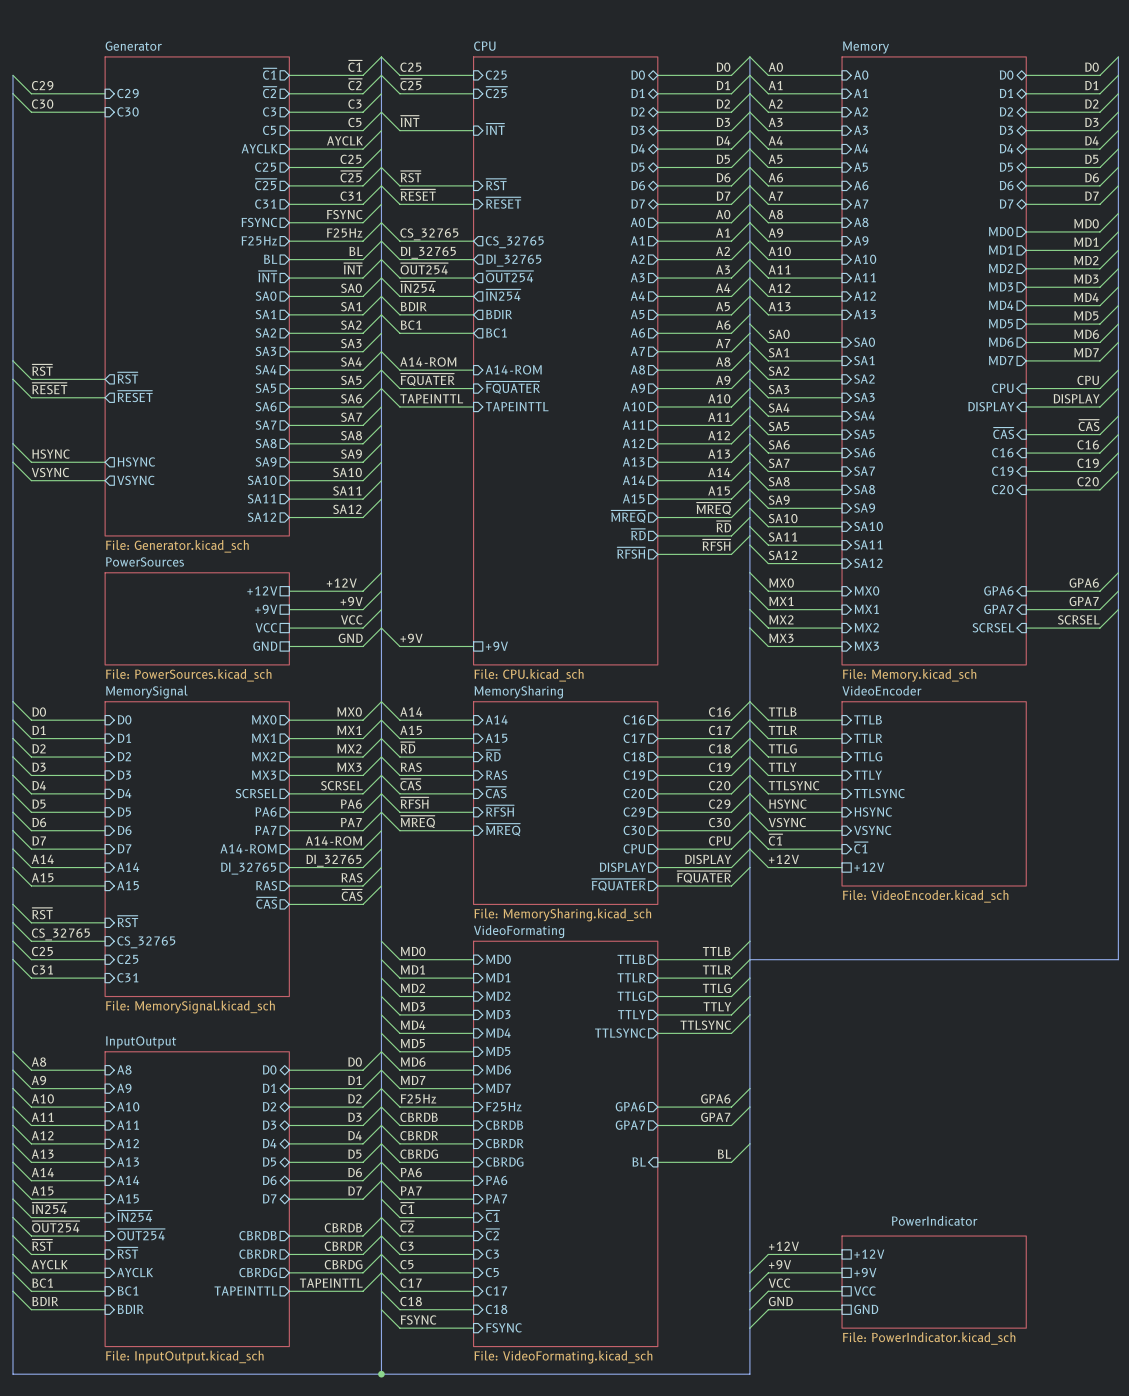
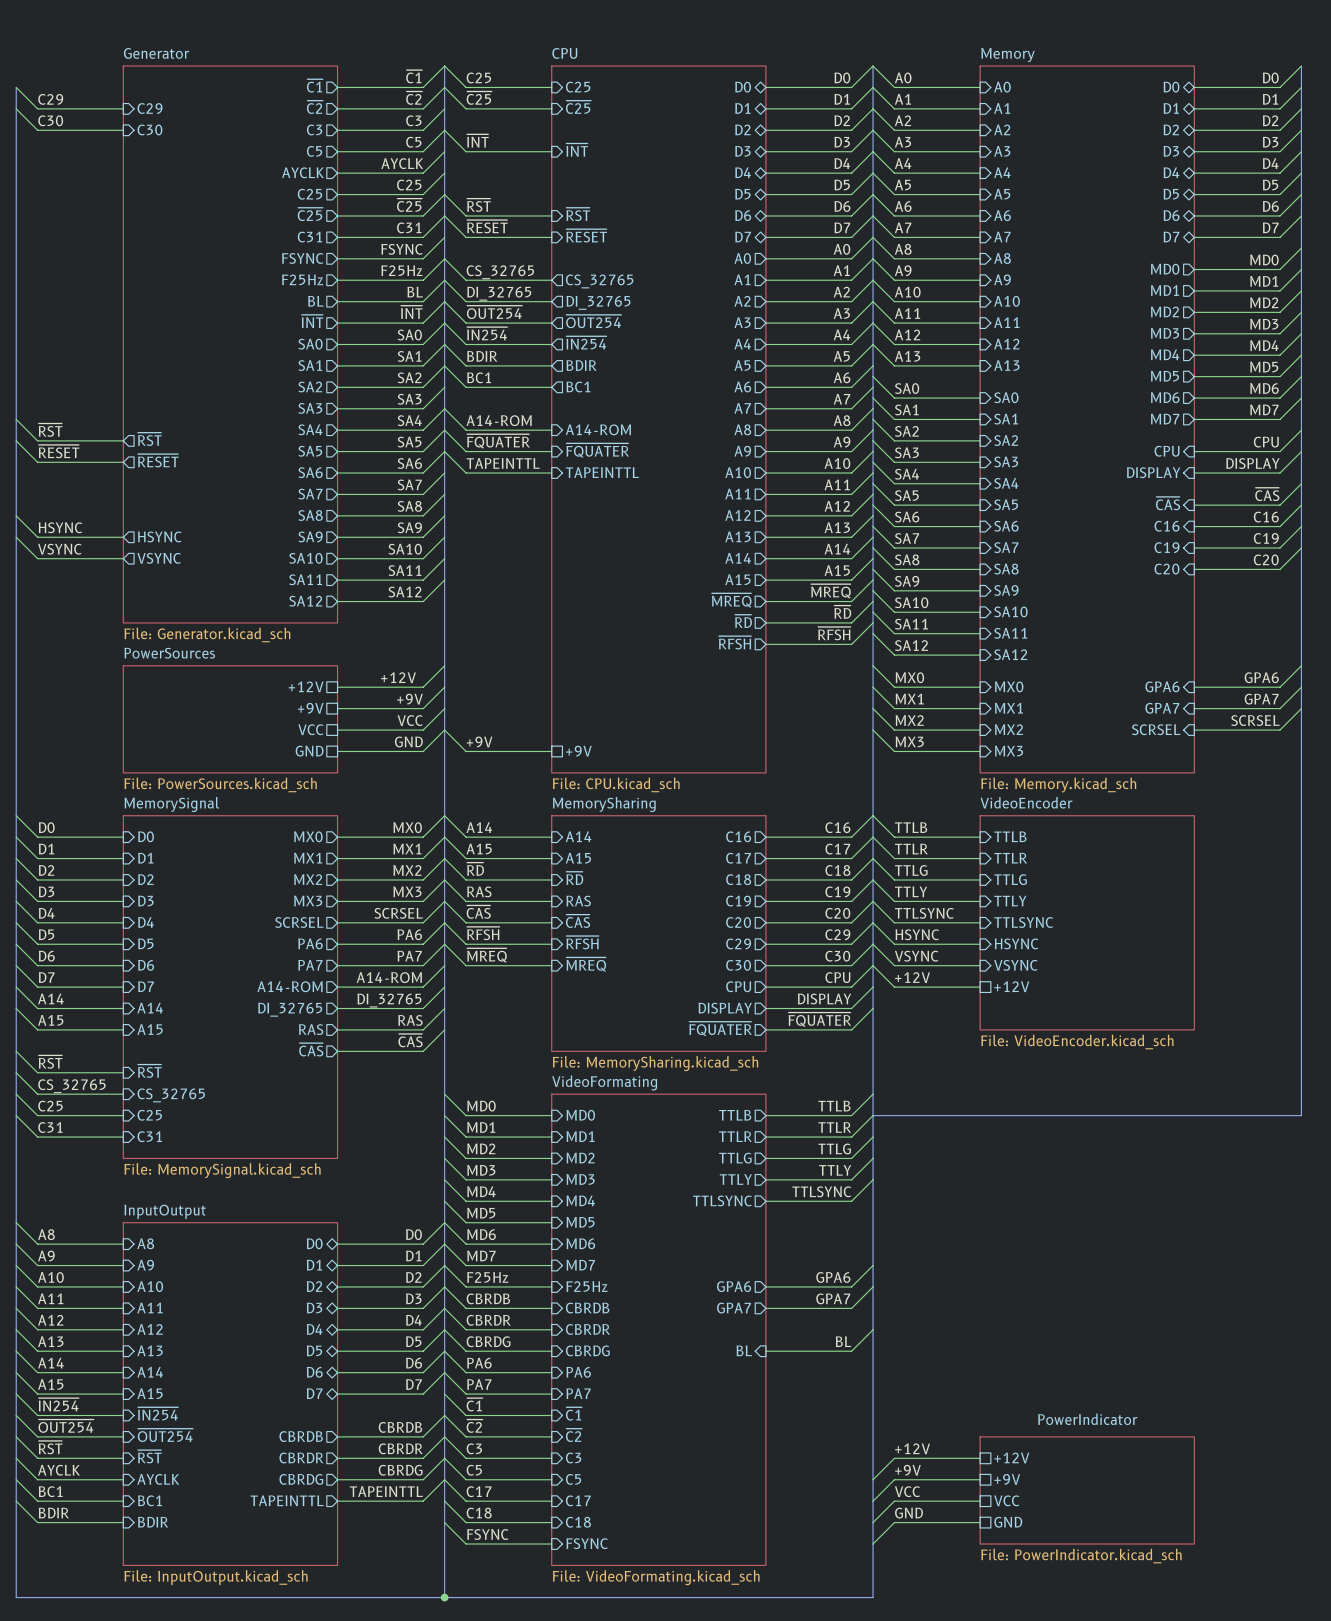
label: ~{C1} (775, 839) -> +12V (912, 977)
sheet pin shape: input (861, 847) -> passive (1011, 986)
sheet pin: ~{C1} (861, 847) -> +12V (1011, 986)
wire: (749, 849) (768, 867) (842, 867) -> none
label: +12V (783, 859) -> none
sheet pin: +12V (869, 867) -> none

